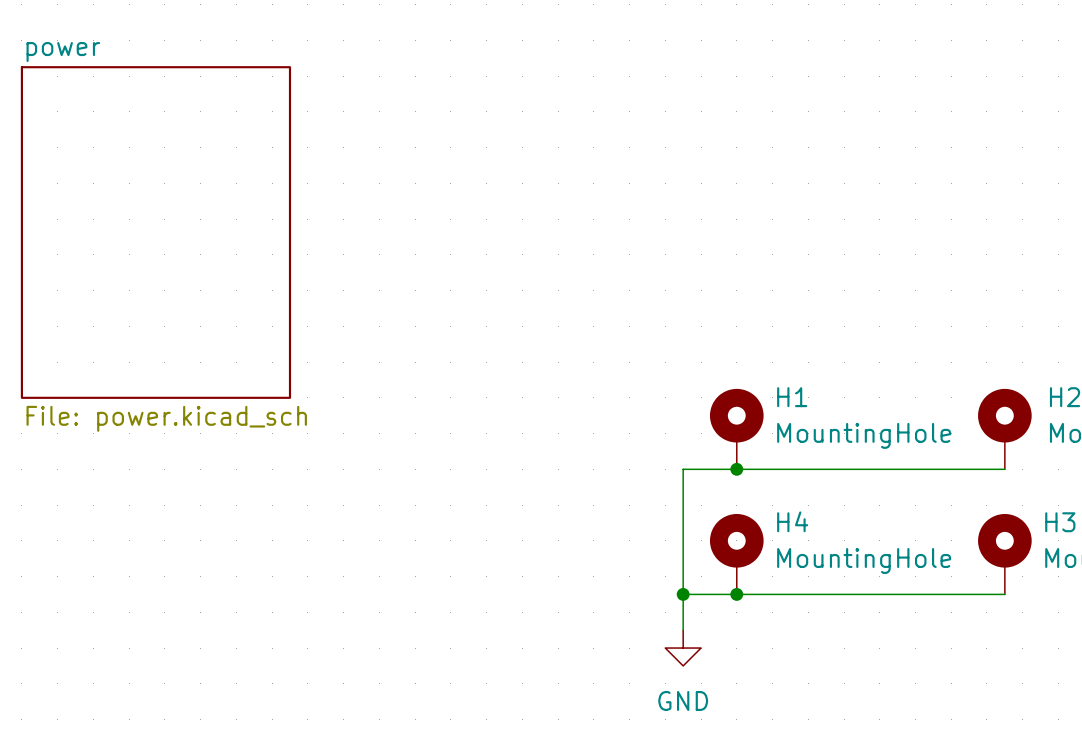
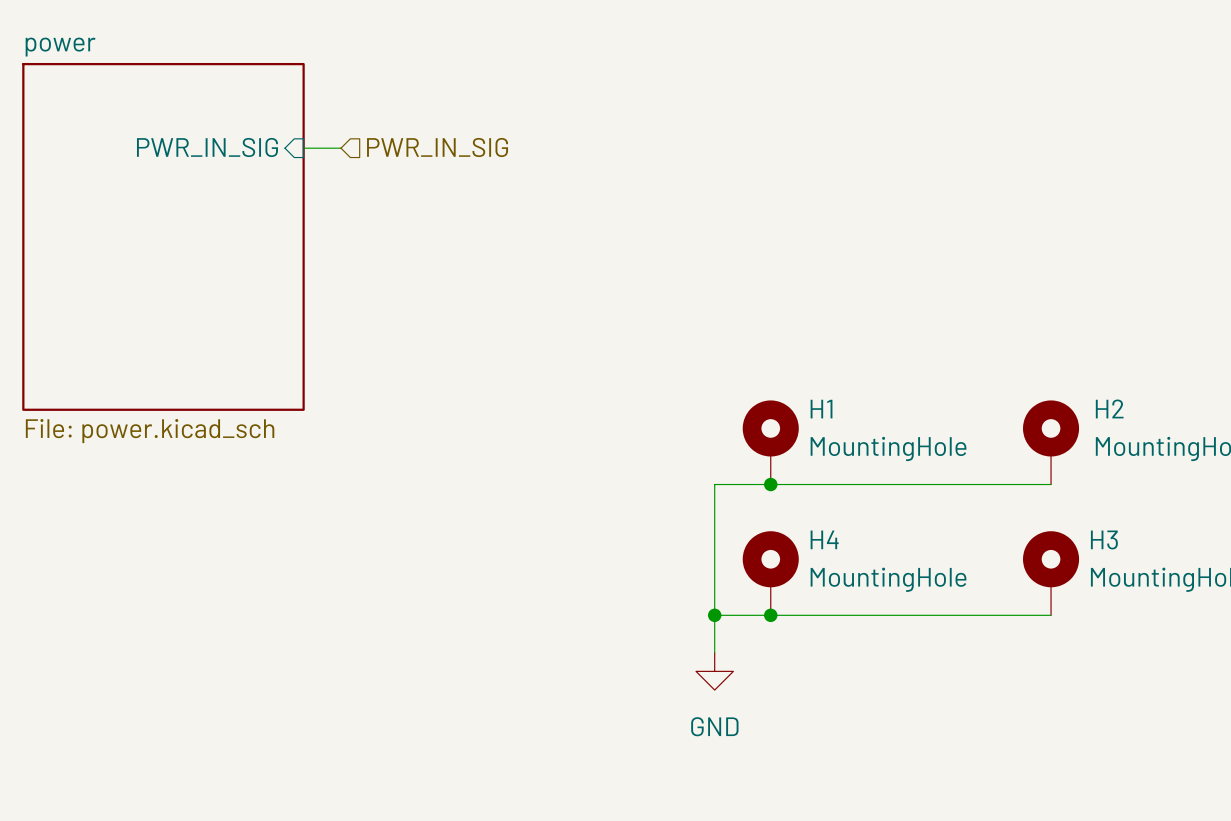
sheet pin: none -> PWR_IN_SIG (207, 147)
wire: none -> (303, 148) (340, 148)
hierarchical label: none -> PWR_IN_SIG (437, 147)

